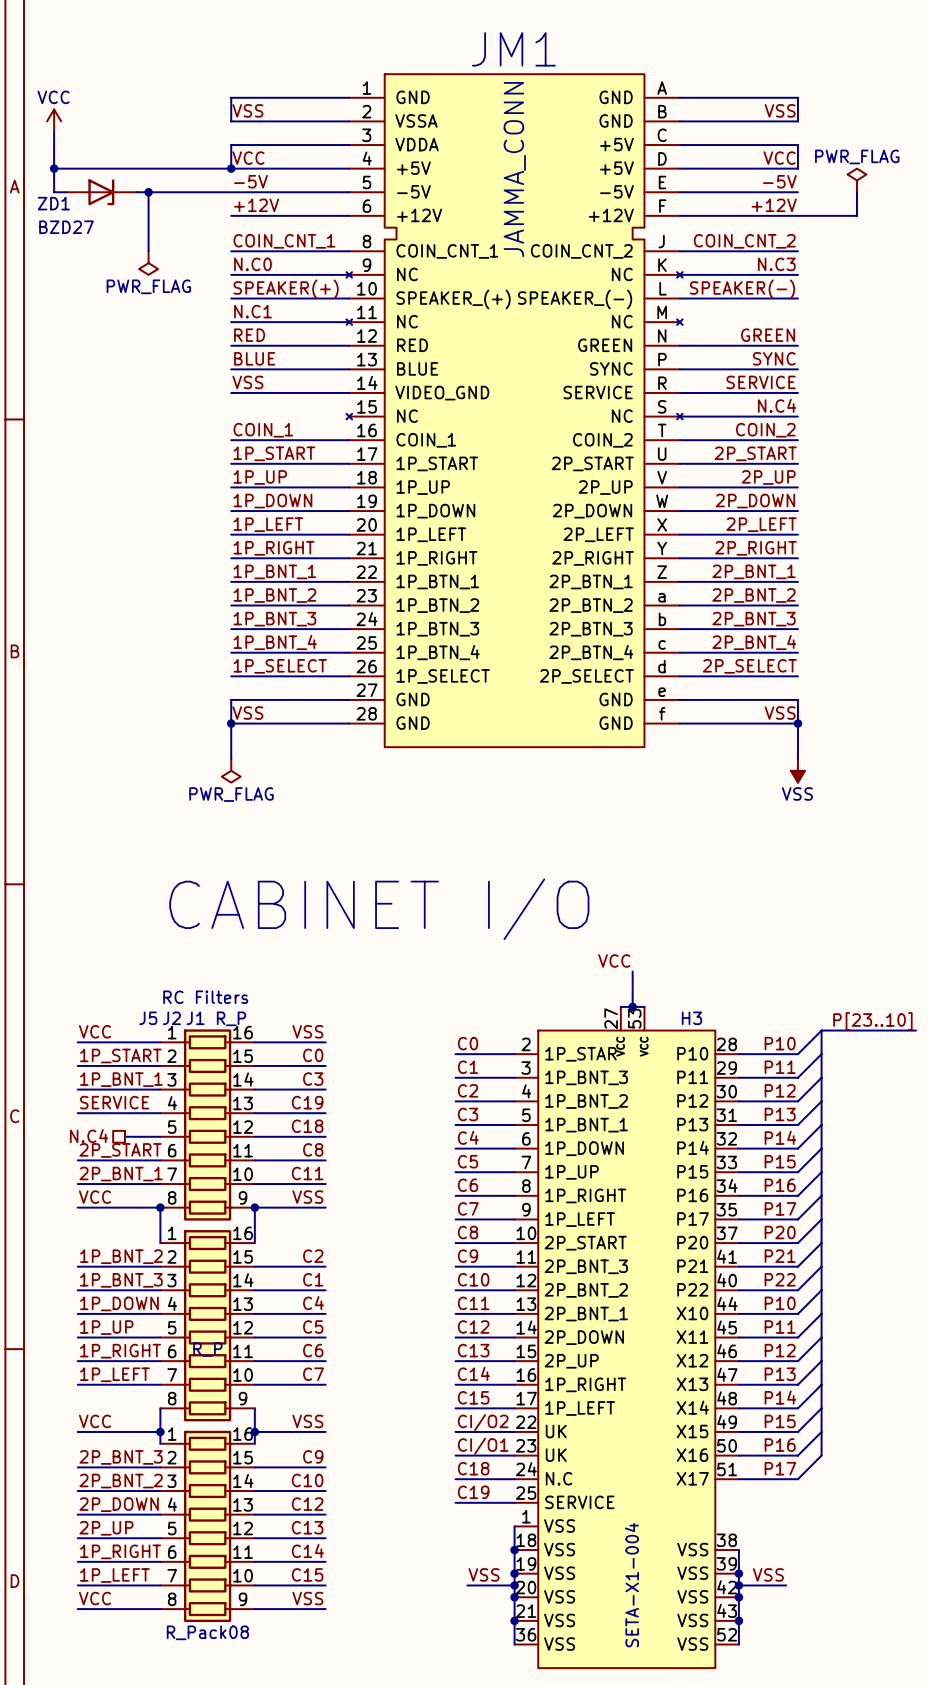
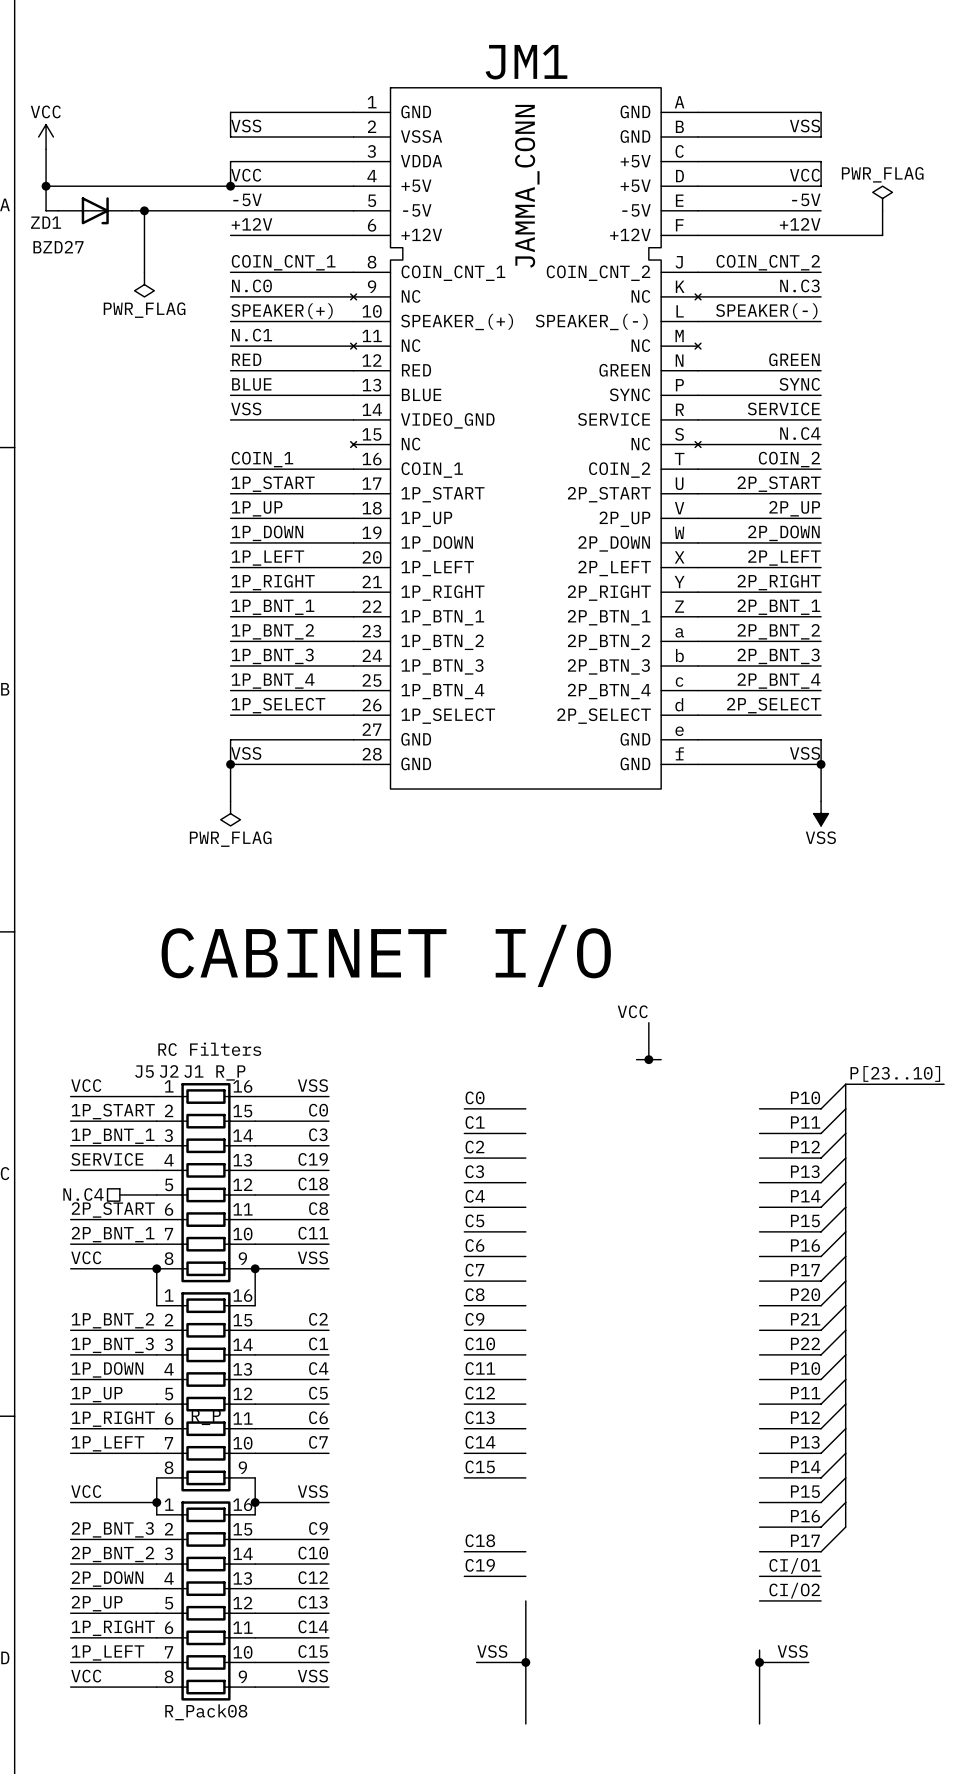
H3: SETA-X1-004 (626, 1337) -> none
label: CI/O2 (483, 1422) -> none
wire: (455, 1431) (514, 1431) -> none
label: CI/O1 (483, 1446) -> none
wire: (455, 1455) (514, 1455) -> none
label: none -> CI/O1 (794, 1566)
wire: none -> (759, 1576) (821, 1576)
label: none -> CI/O2 (794, 1590)
wire: none -> (759, 1600) (821, 1600)
junction: (514, 1550) -> none
wire: (738, 1550) (738, 1573) -> none
junction: (514, 1573) -> none
junction: (738, 1573) -> none
junction: (514, 1597) -> none
junction: (738, 1597) -> none
junction: (514, 1620) -> none
junction: (738, 1620) -> none

